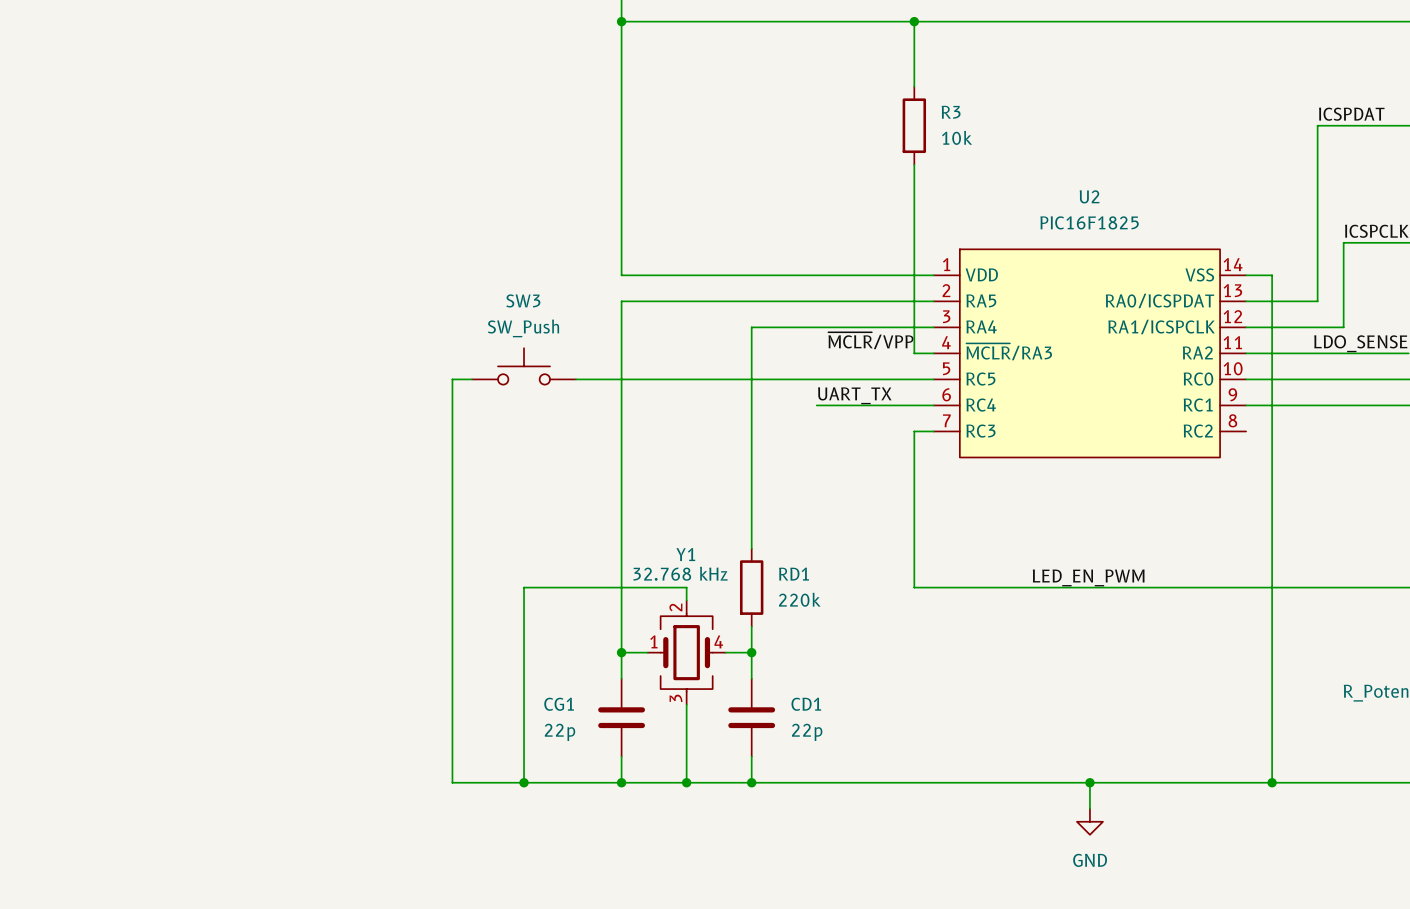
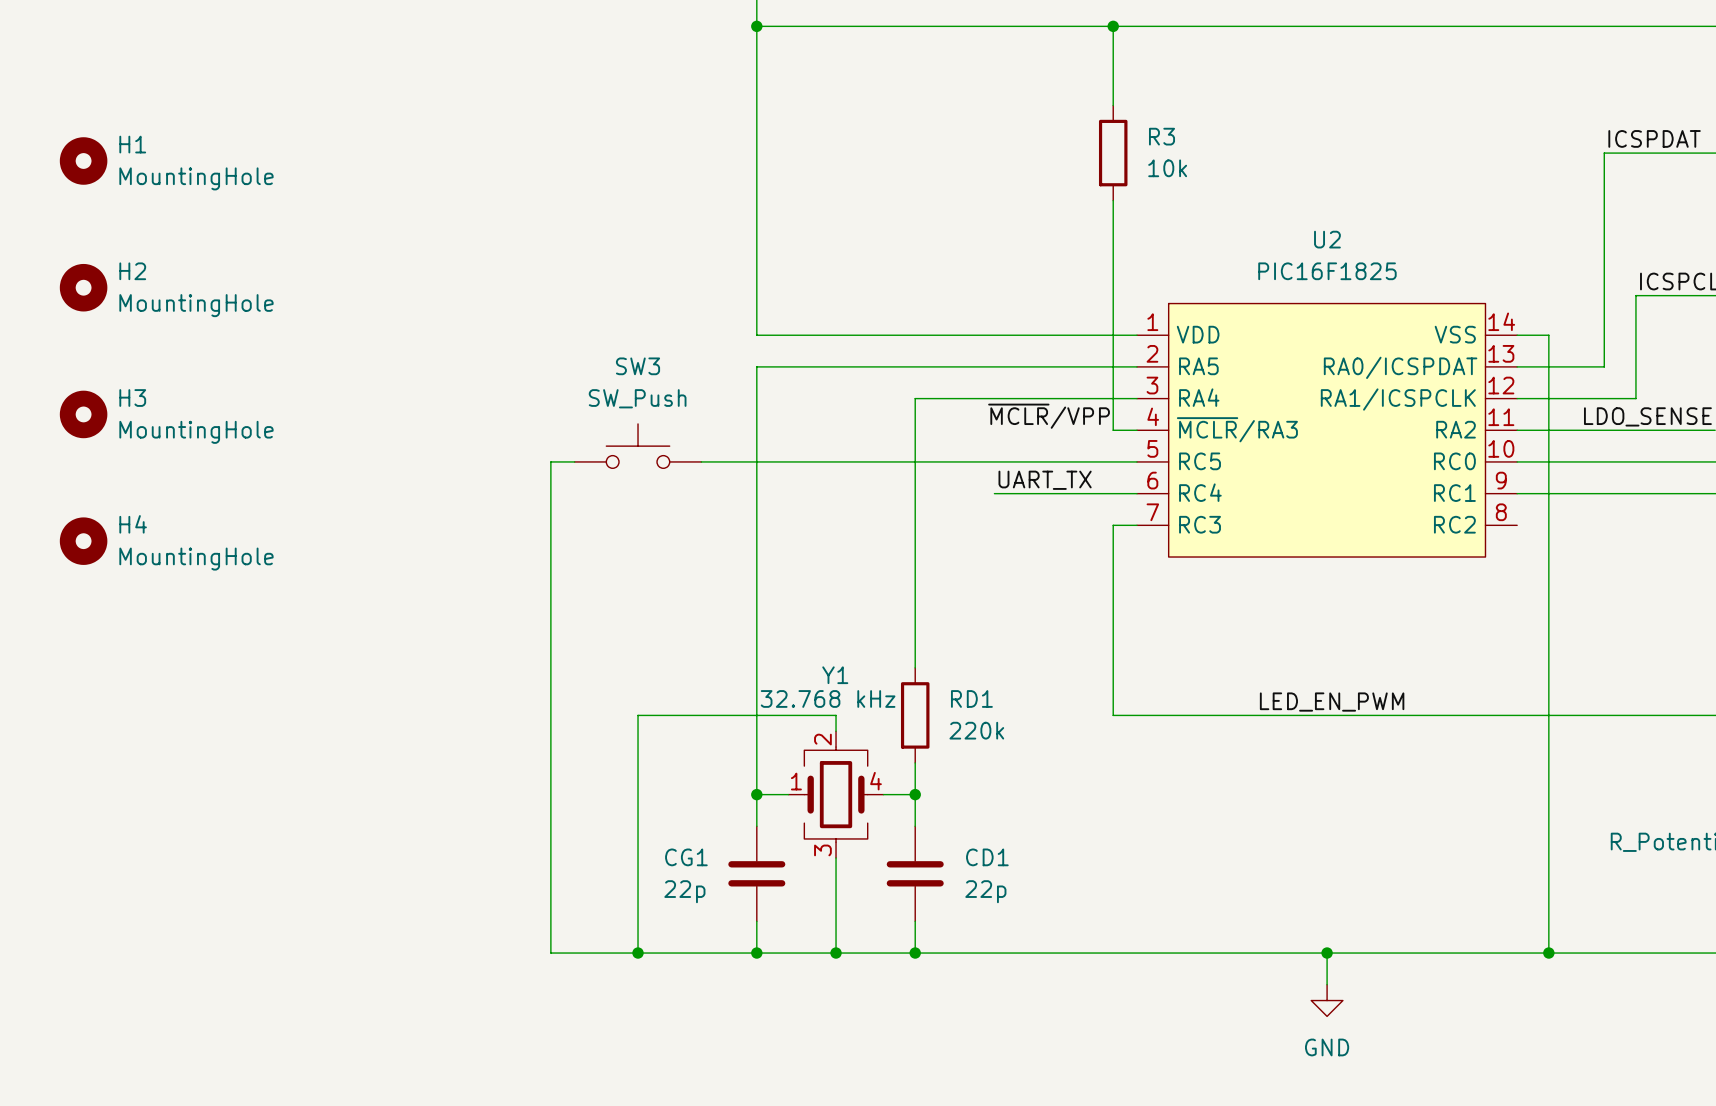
H1: none -> MountingHole (83, 160)
H2: none -> MountingHole (83, 287)
H3: none -> MountingHole (83, 414)
H4: none -> MountingHole (83, 541)

